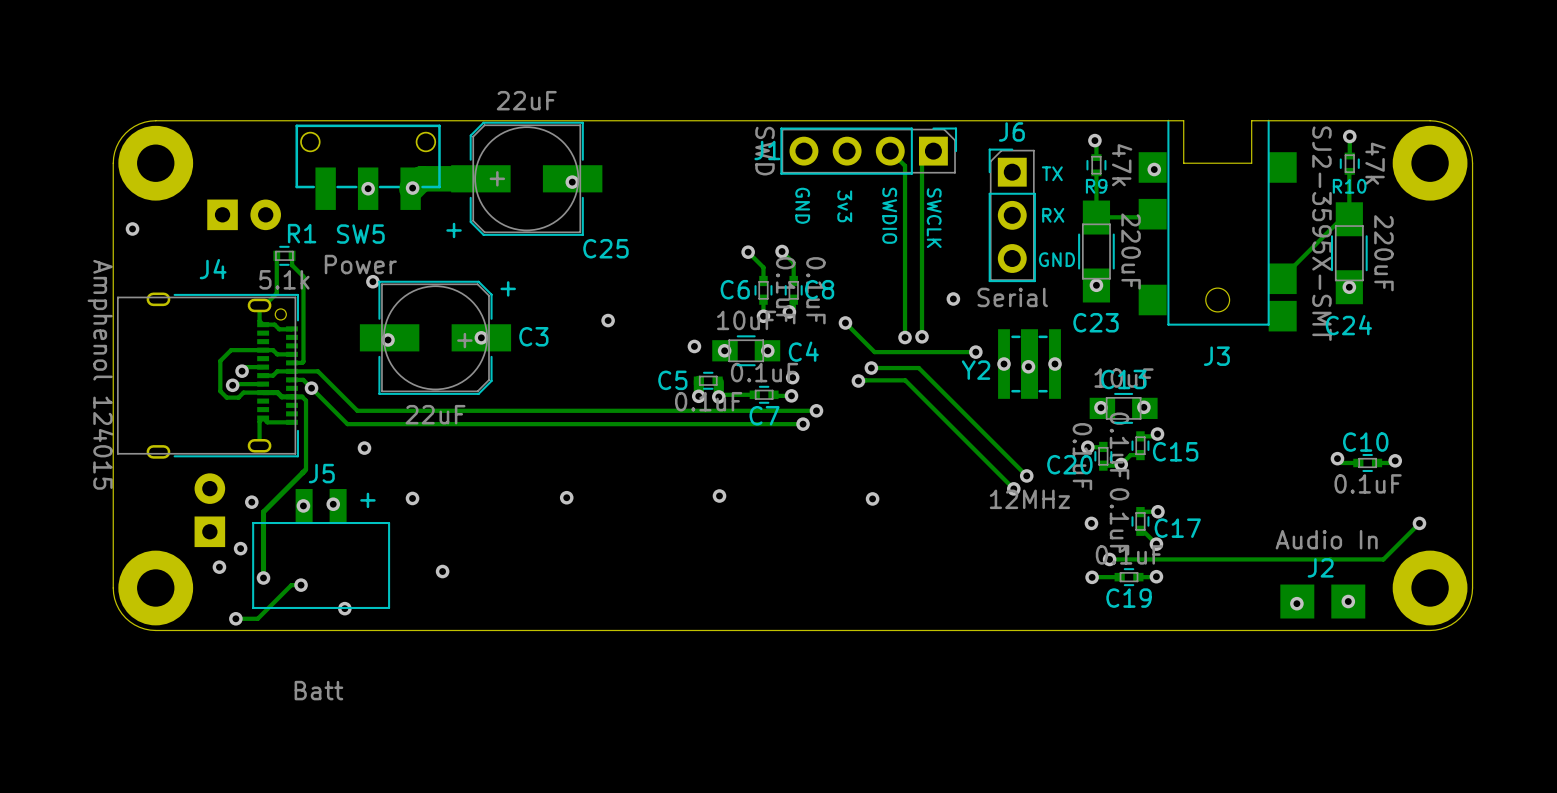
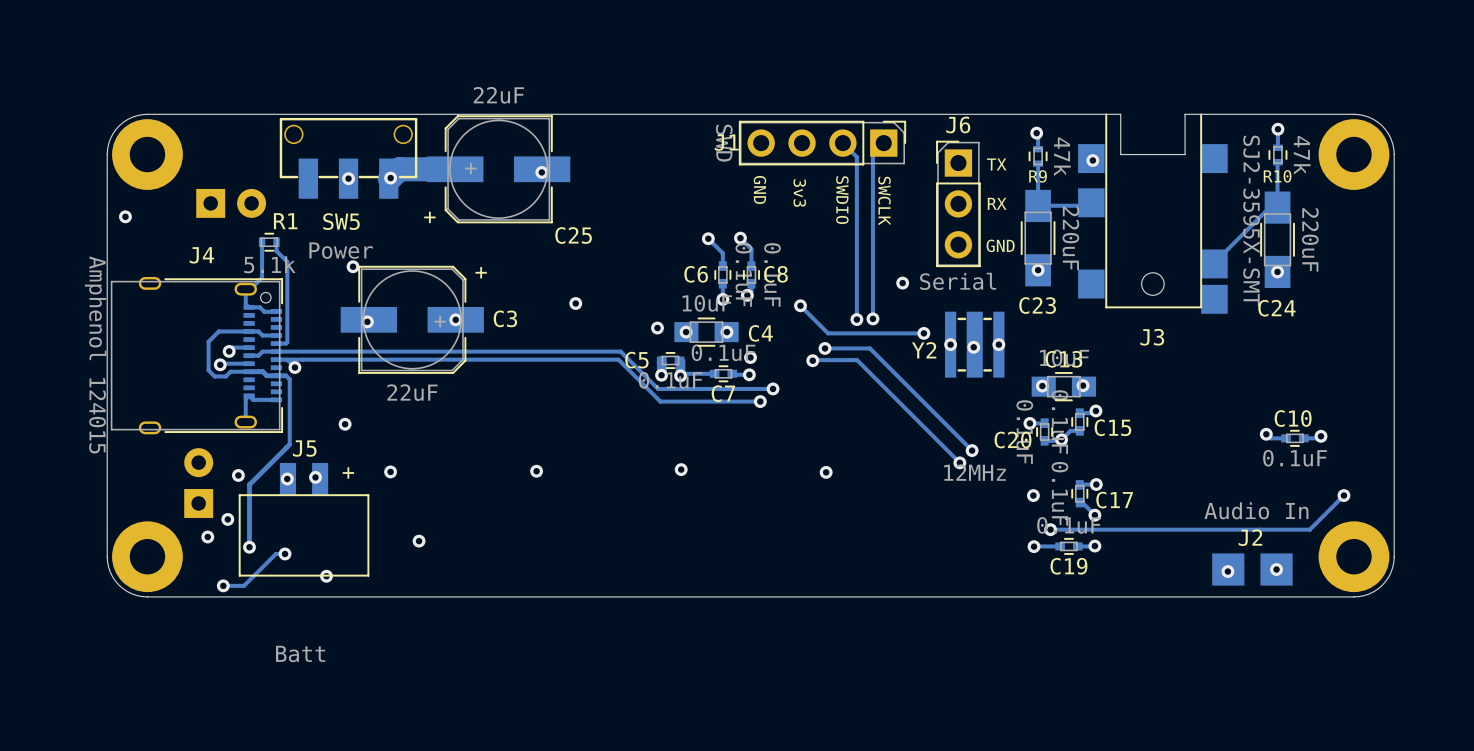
track: (317, 371) (357, 410) (695, 410) -> (301, 351) (620, 351) (658, 388)
track: (311, 388) (347, 424) (697, 424) -> (287, 359) (618, 359) (660, 401)

